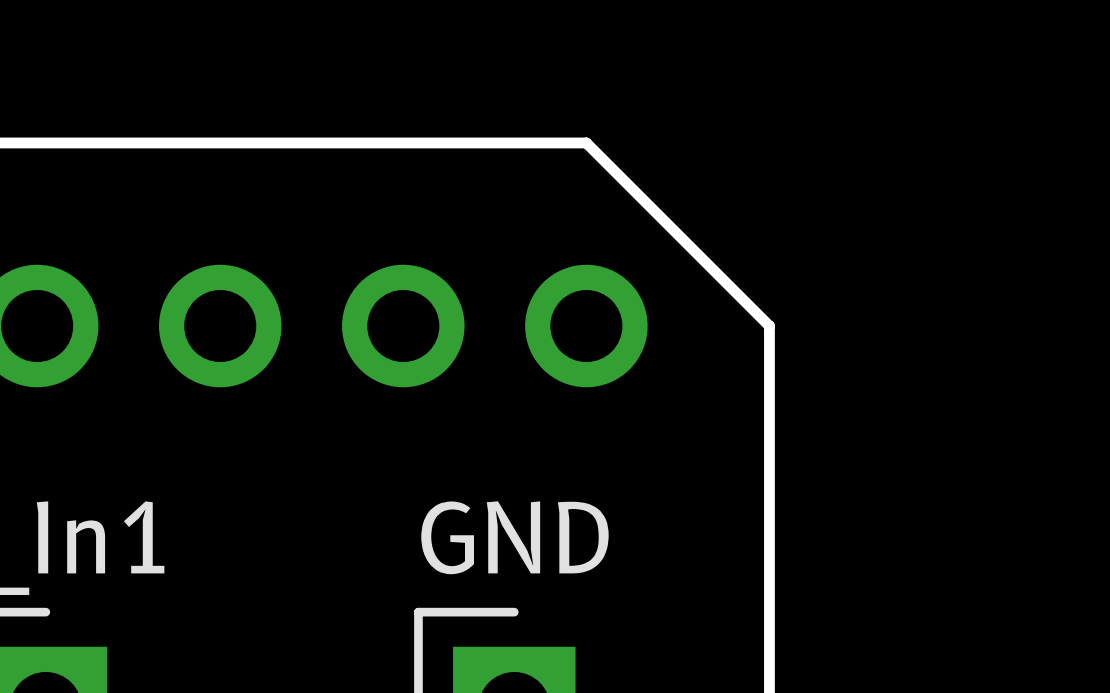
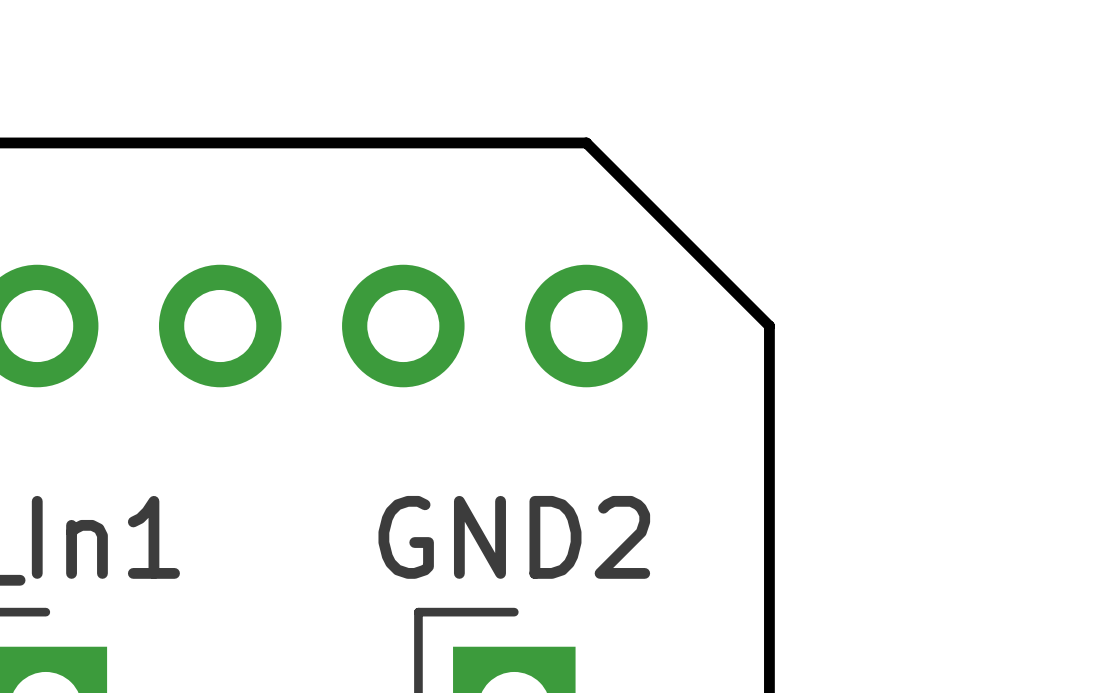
GND name: GND (514, 537) -> GND2 (514, 537)

